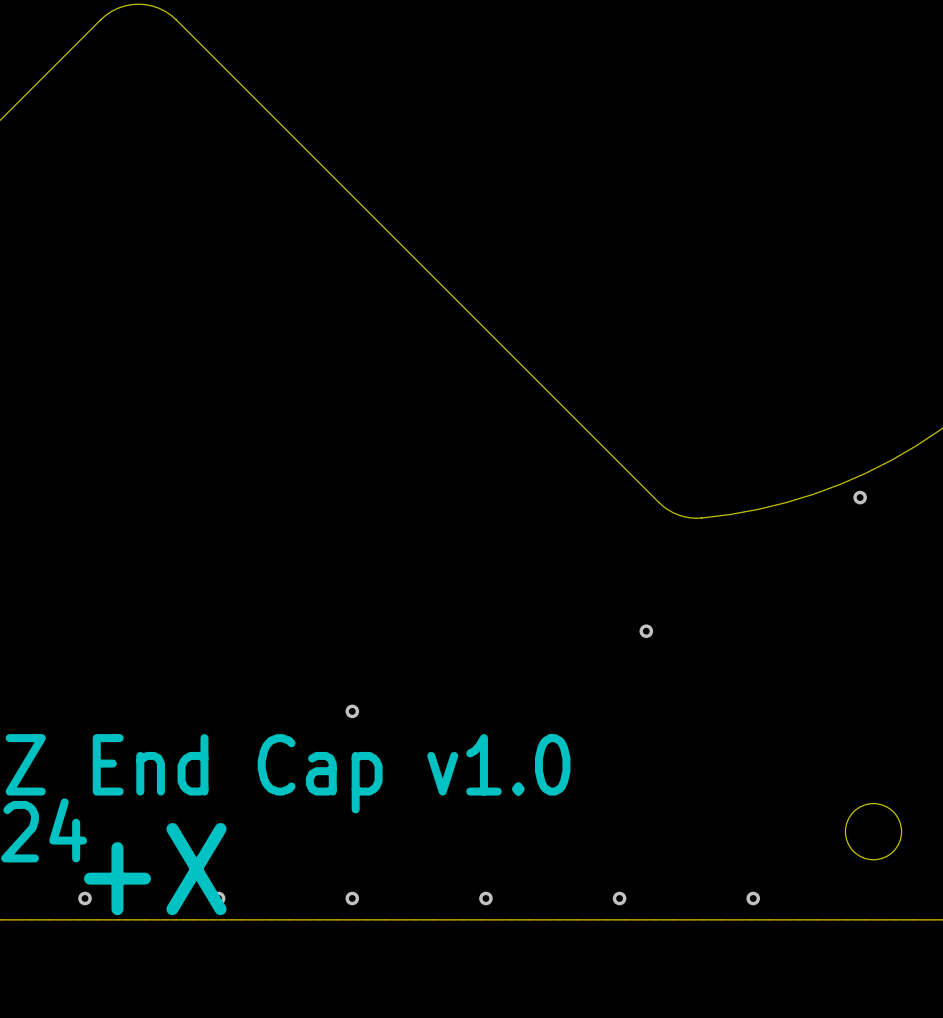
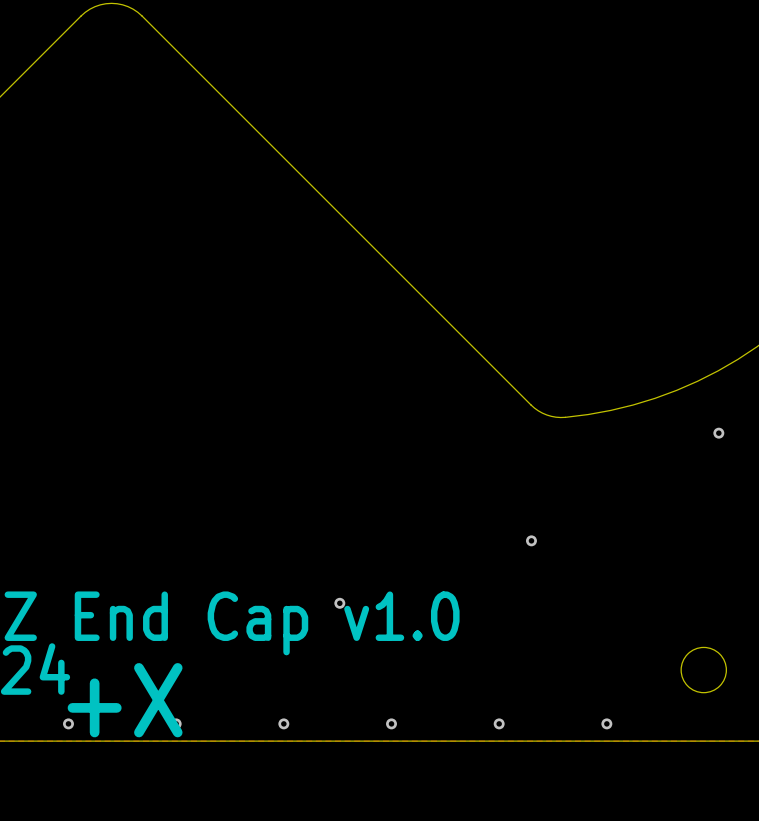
via position: (860, 497) -> (718, 433)
via position: (646, 631) -> (531, 540)
via position: (352, 711) -> (339, 603)

